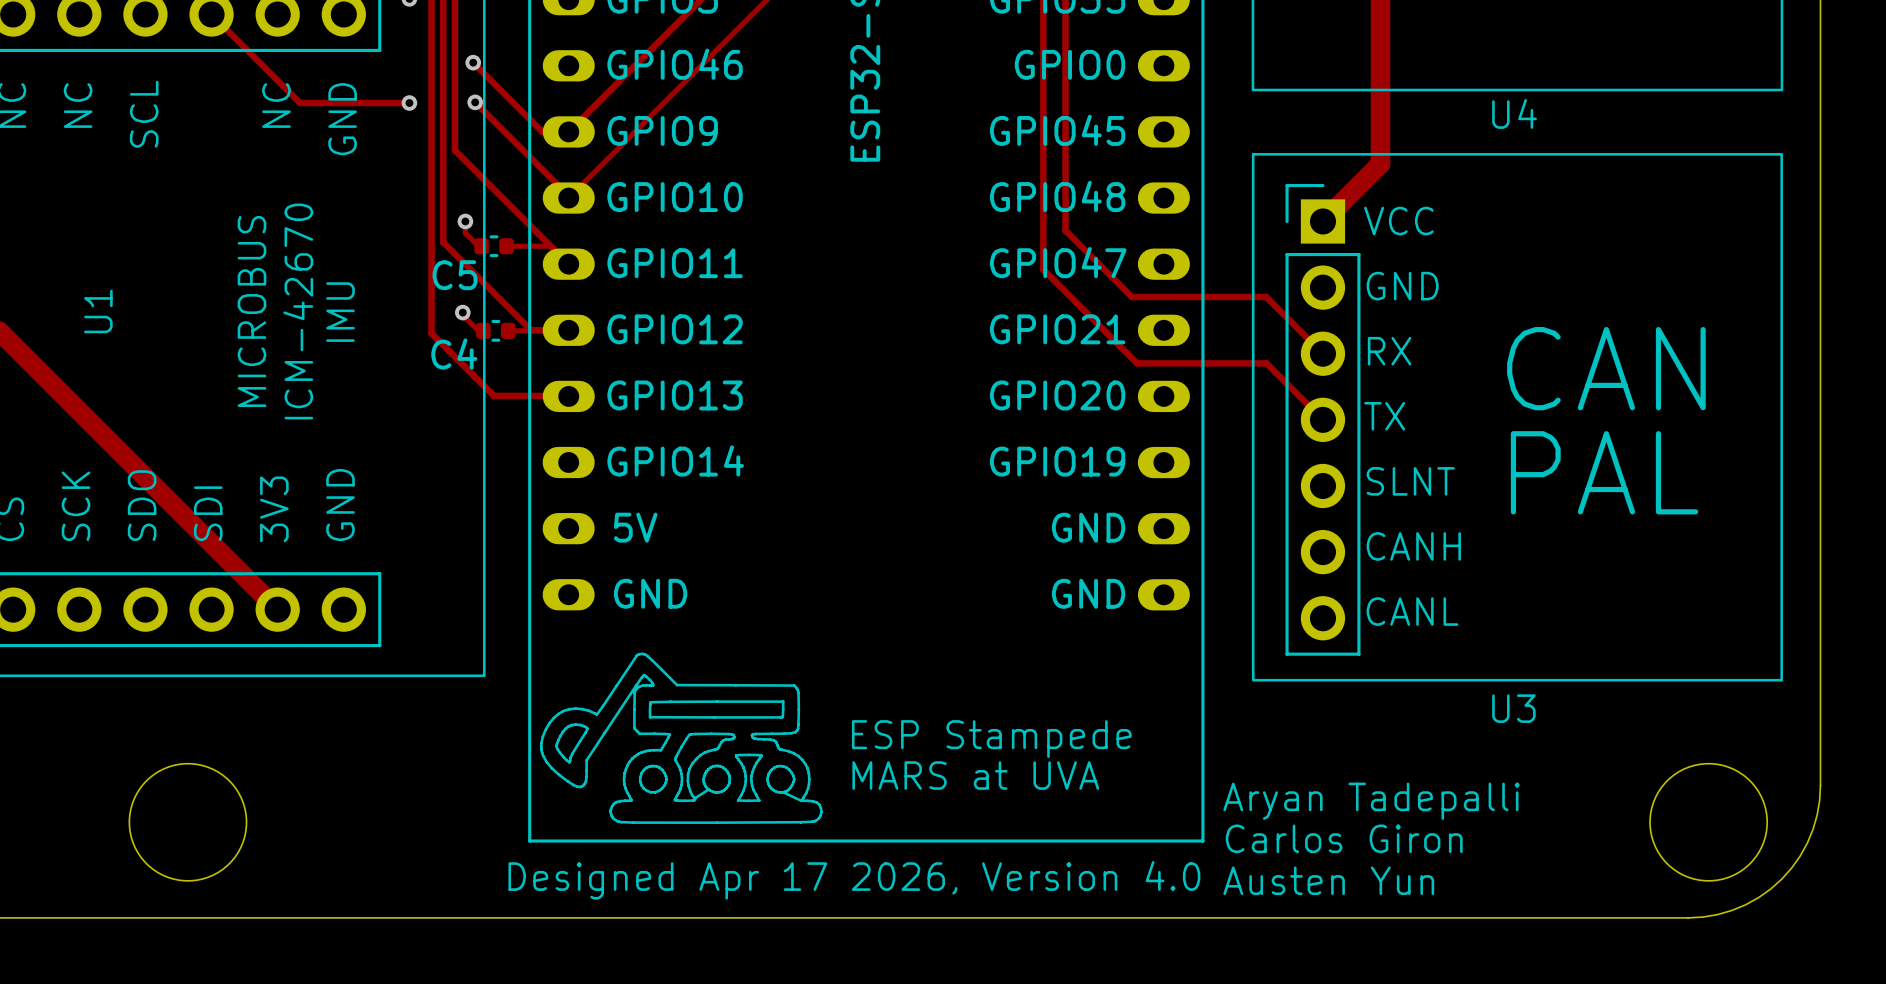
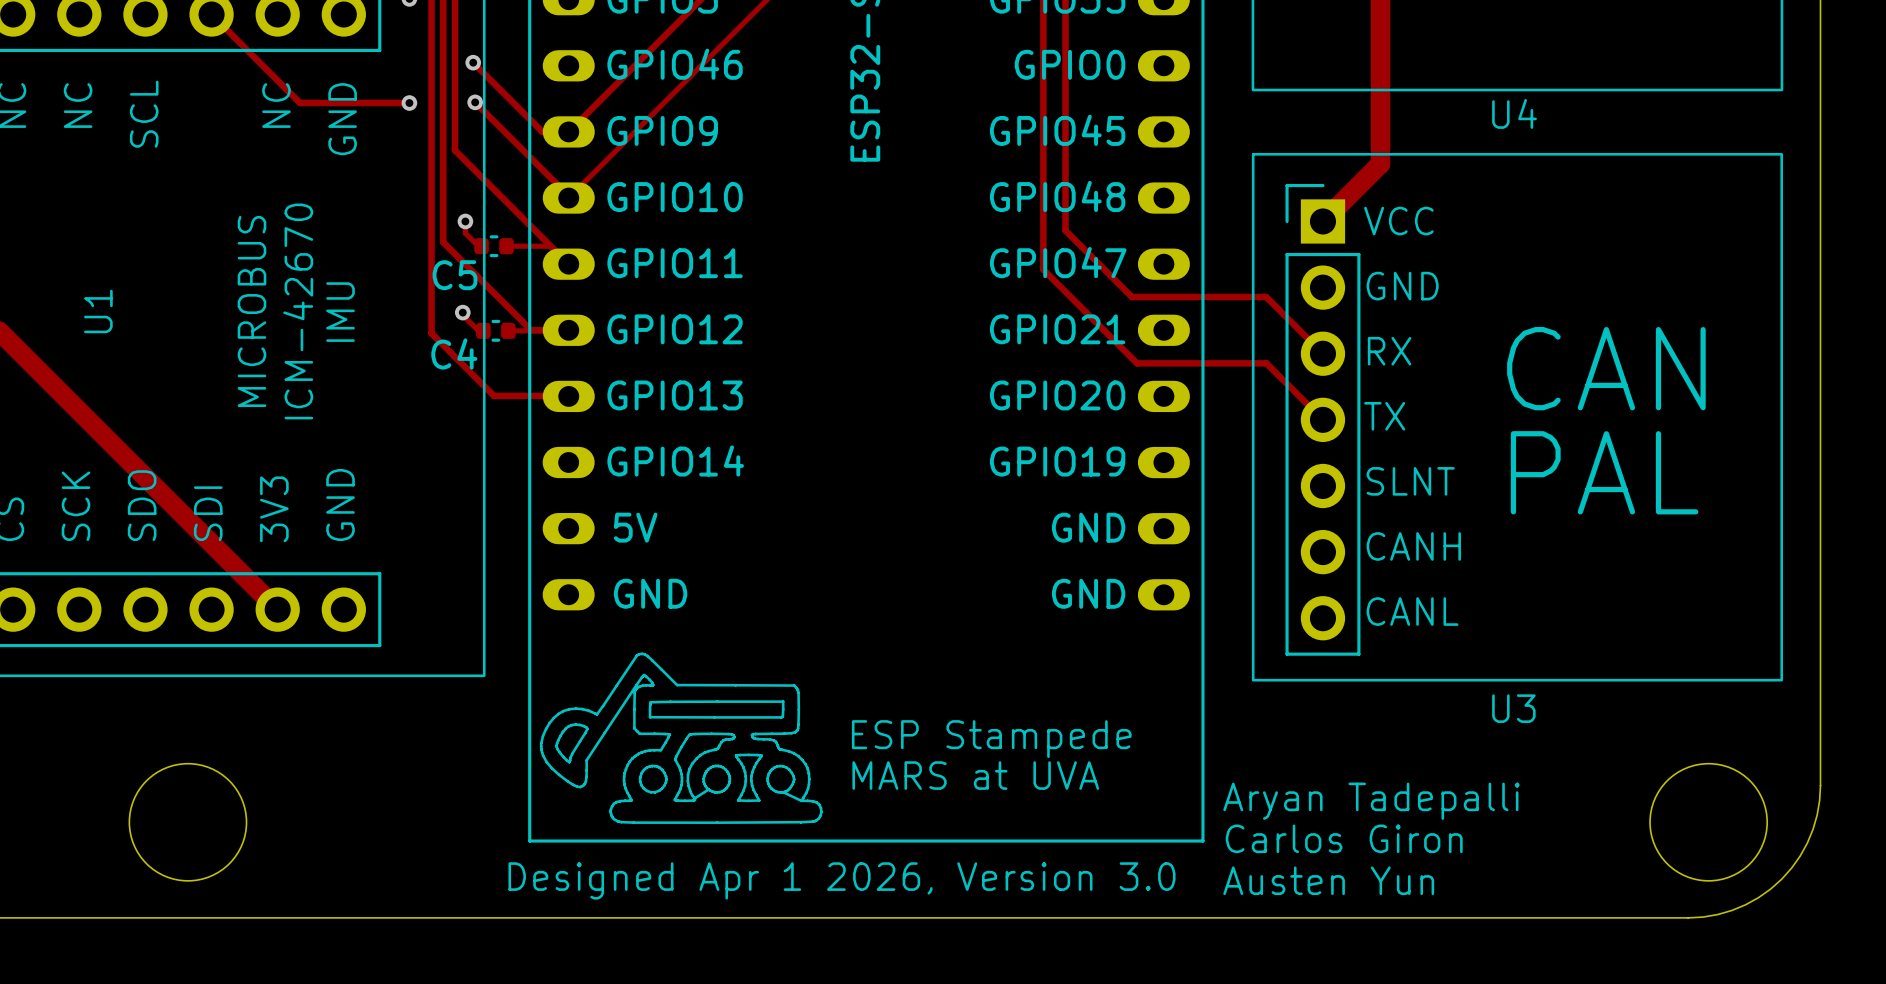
text: Designed Apr 17 2026, Version 4.0 (854, 880) -> Designed Apr 1 2026, Version 3.0 (842, 880)

